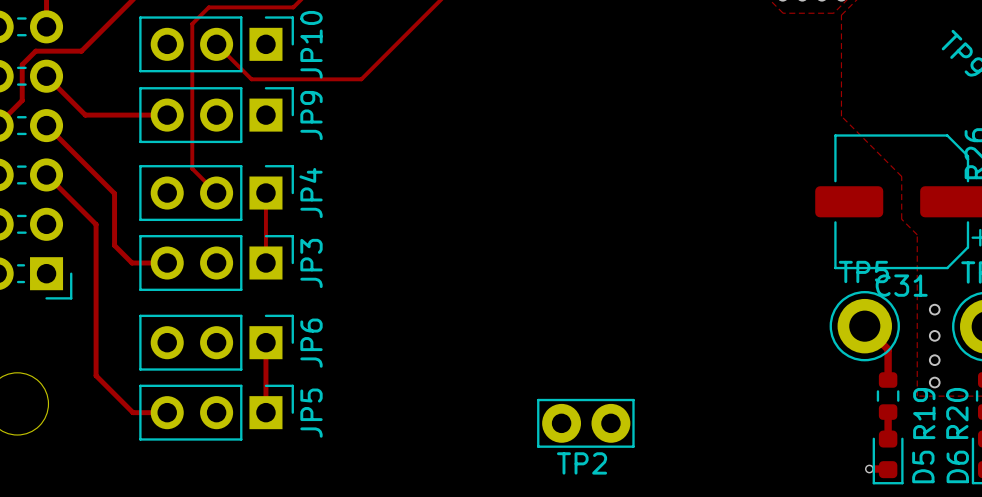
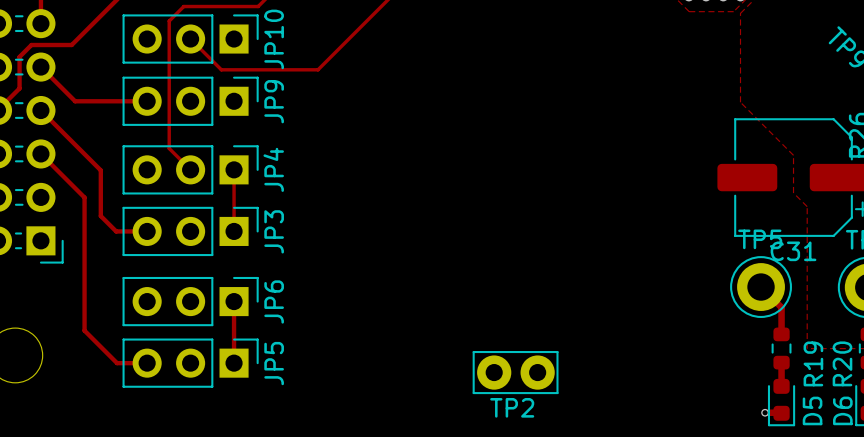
via: (934, 309) -> none
via: (934, 335) -> none
via: (934, 360) -> none
via: (934, 382) -> none

